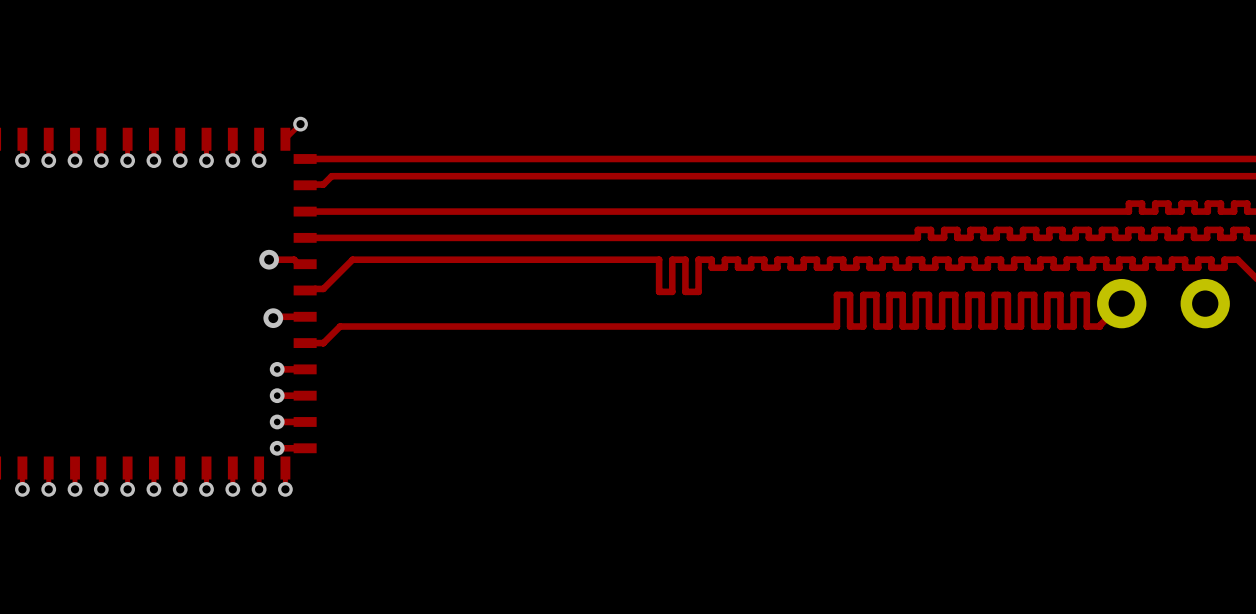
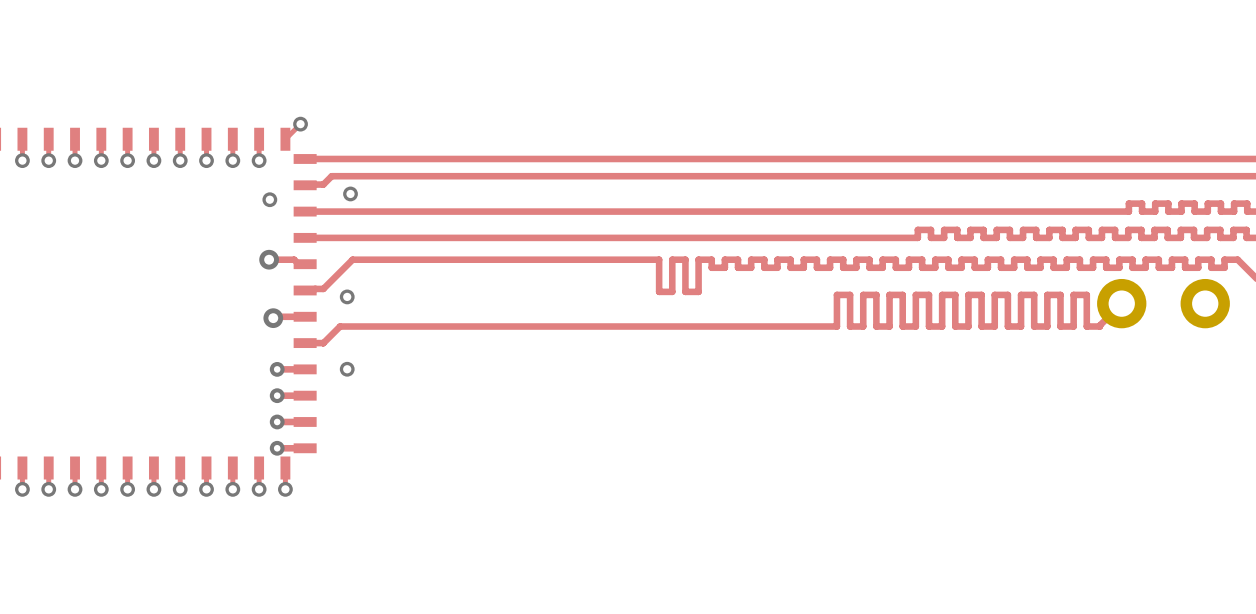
via: none -> (350, 193)
via: none -> (269, 199)
via: none -> (347, 296)
via: none -> (347, 369)

